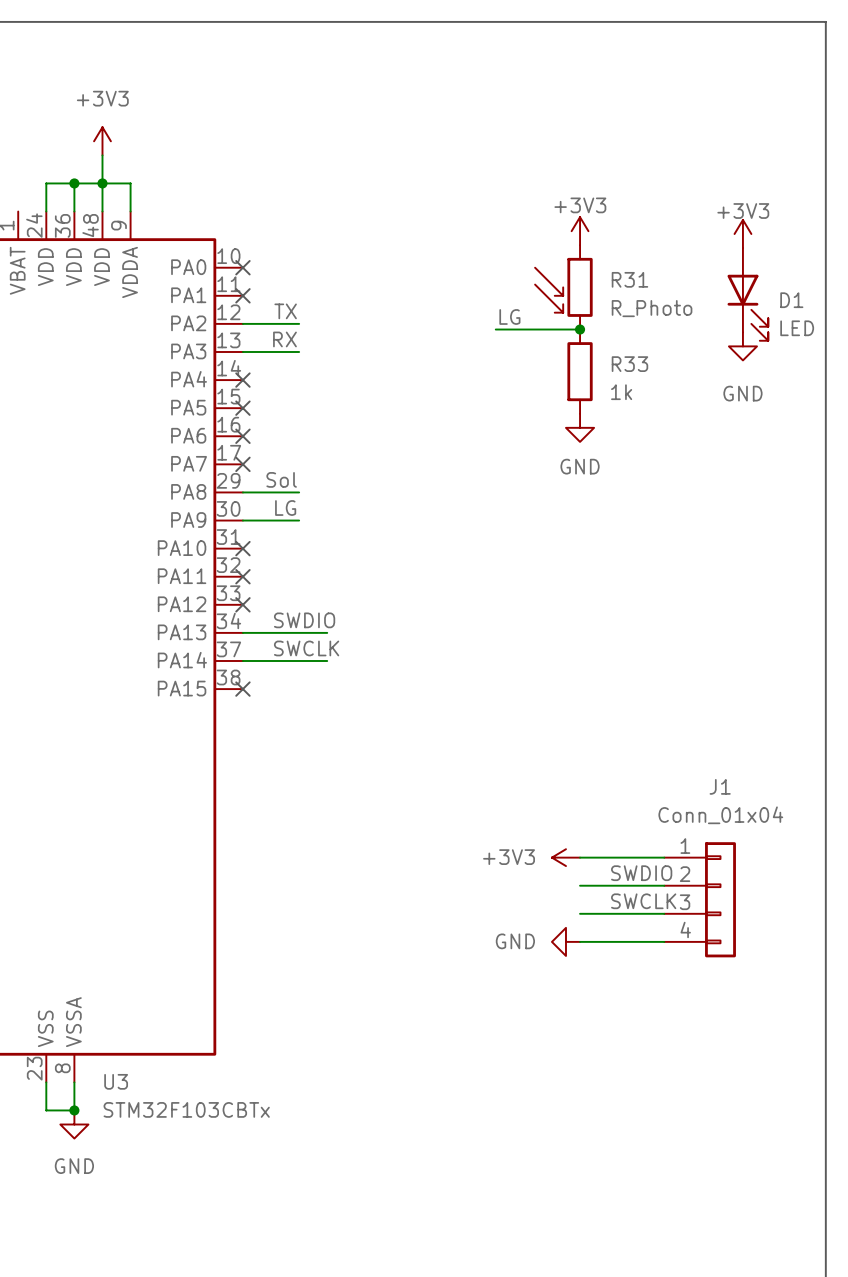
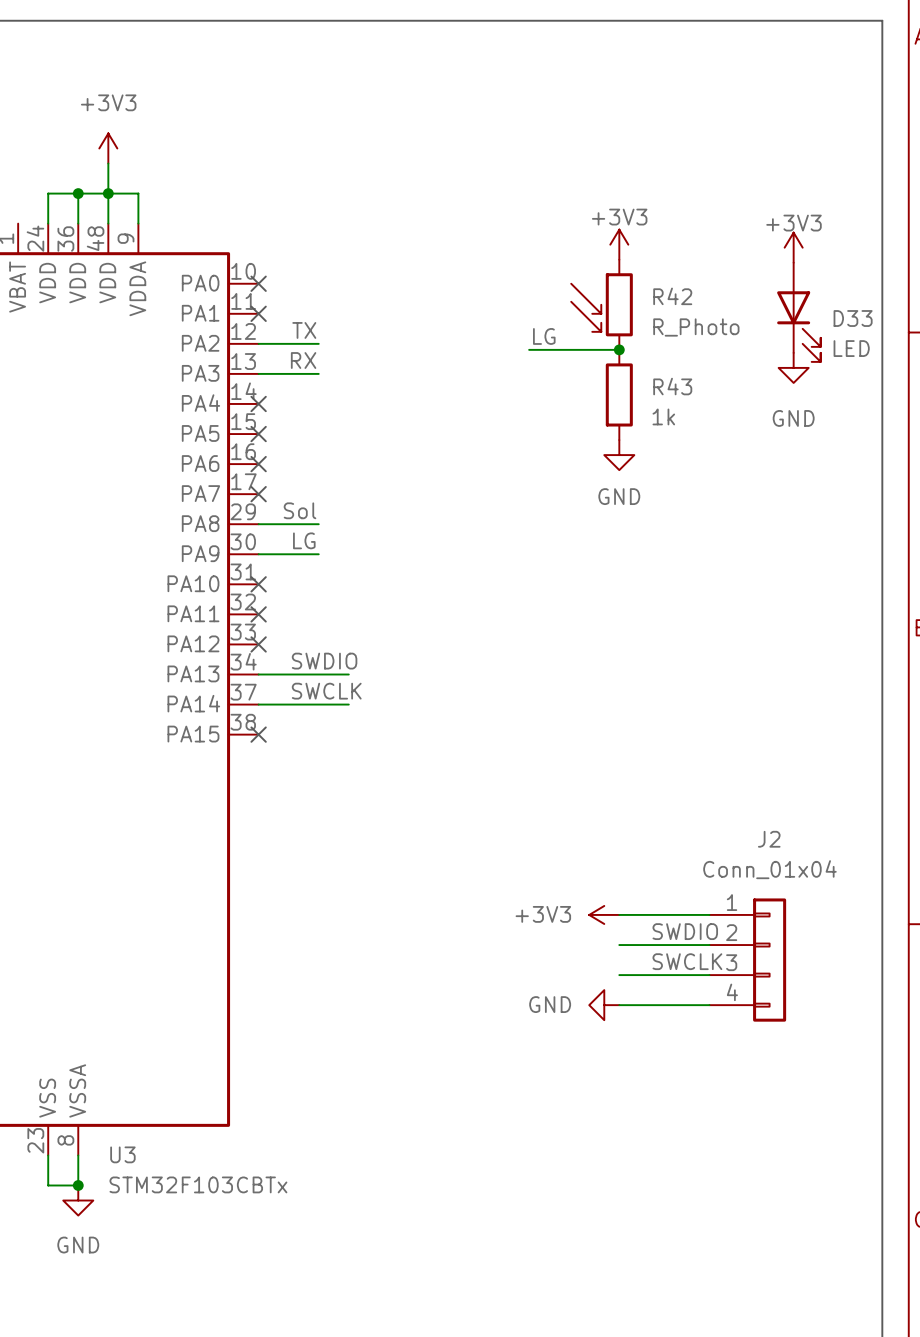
R31 name: R31 (629, 279) -> R42 (672, 296)
D1 name: D1 (791, 300) -> D33 (853, 318)
R33 name: R33 (629, 364) -> R43 (672, 386)
J1 name: J1 (720, 786) -> J2 (769, 839)

